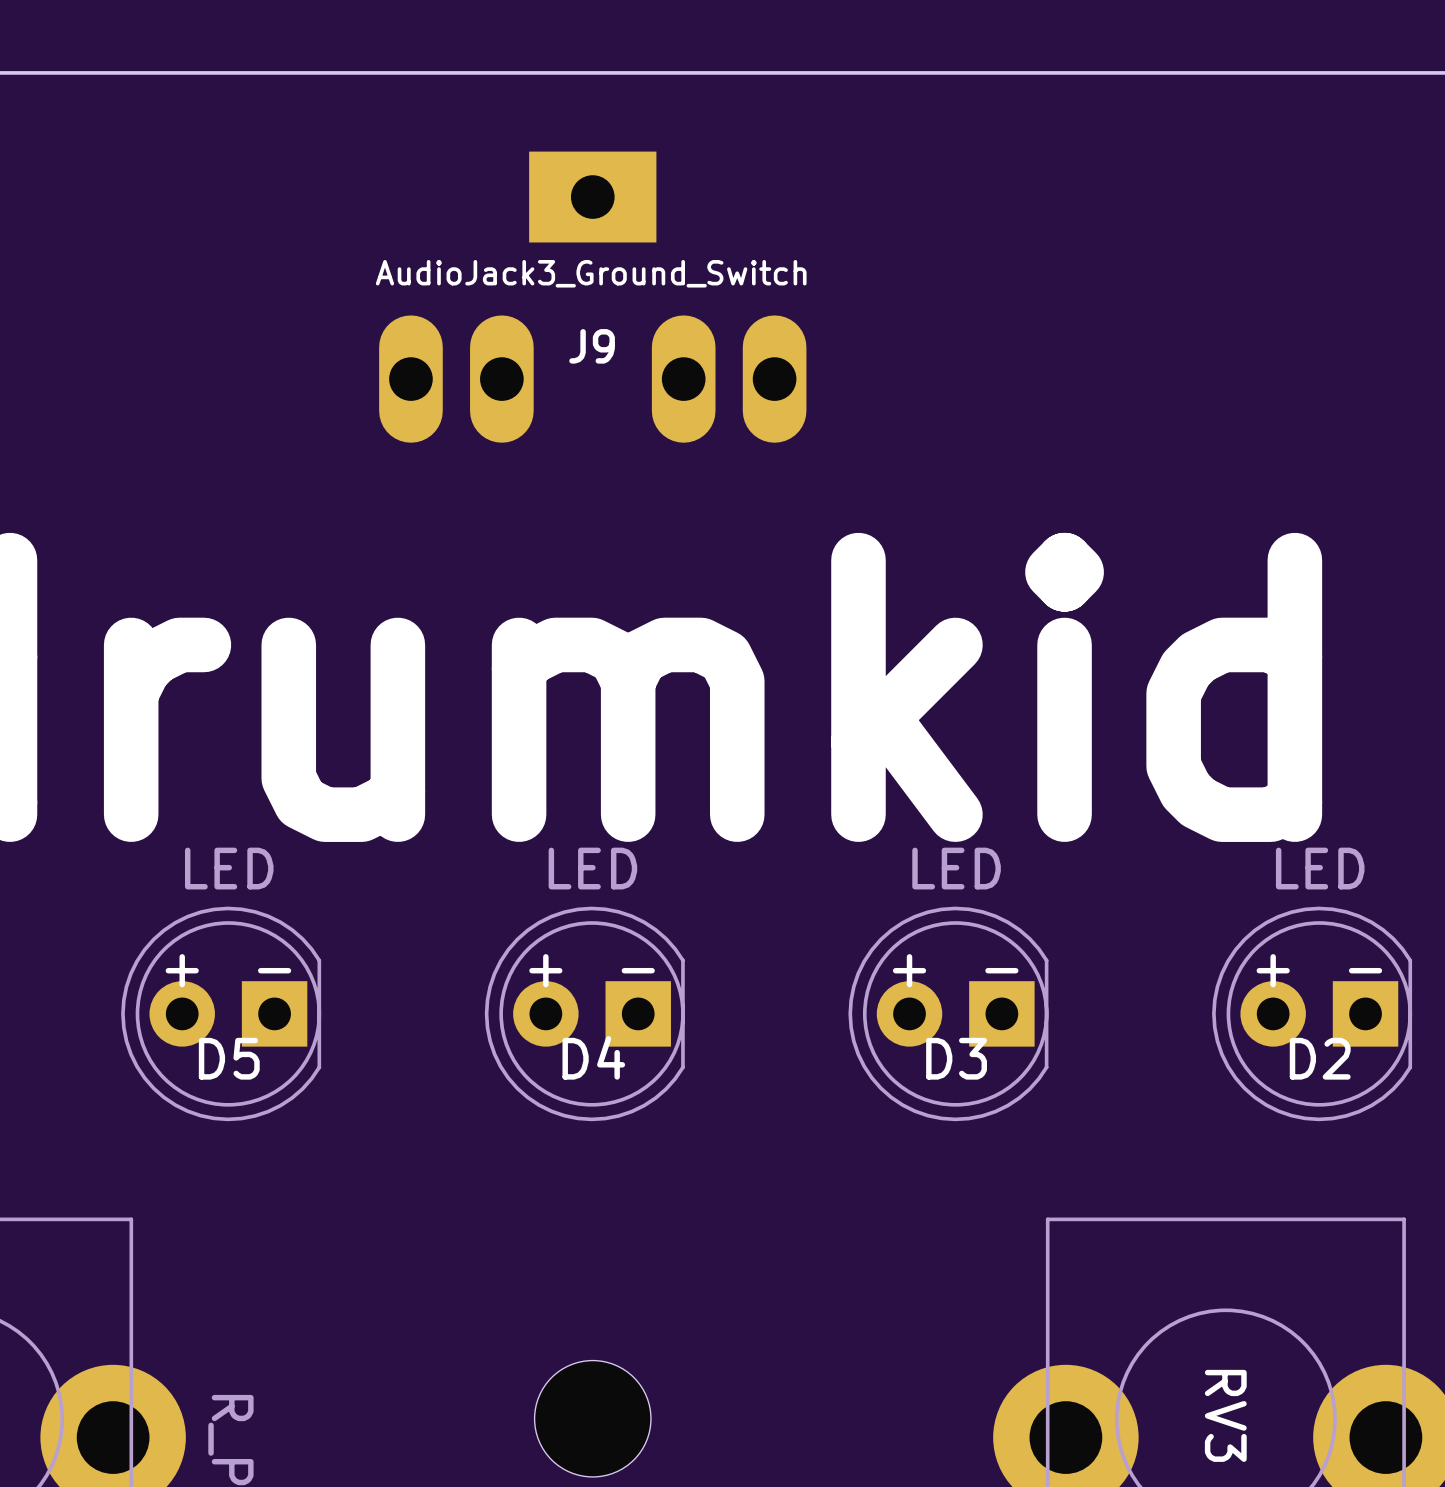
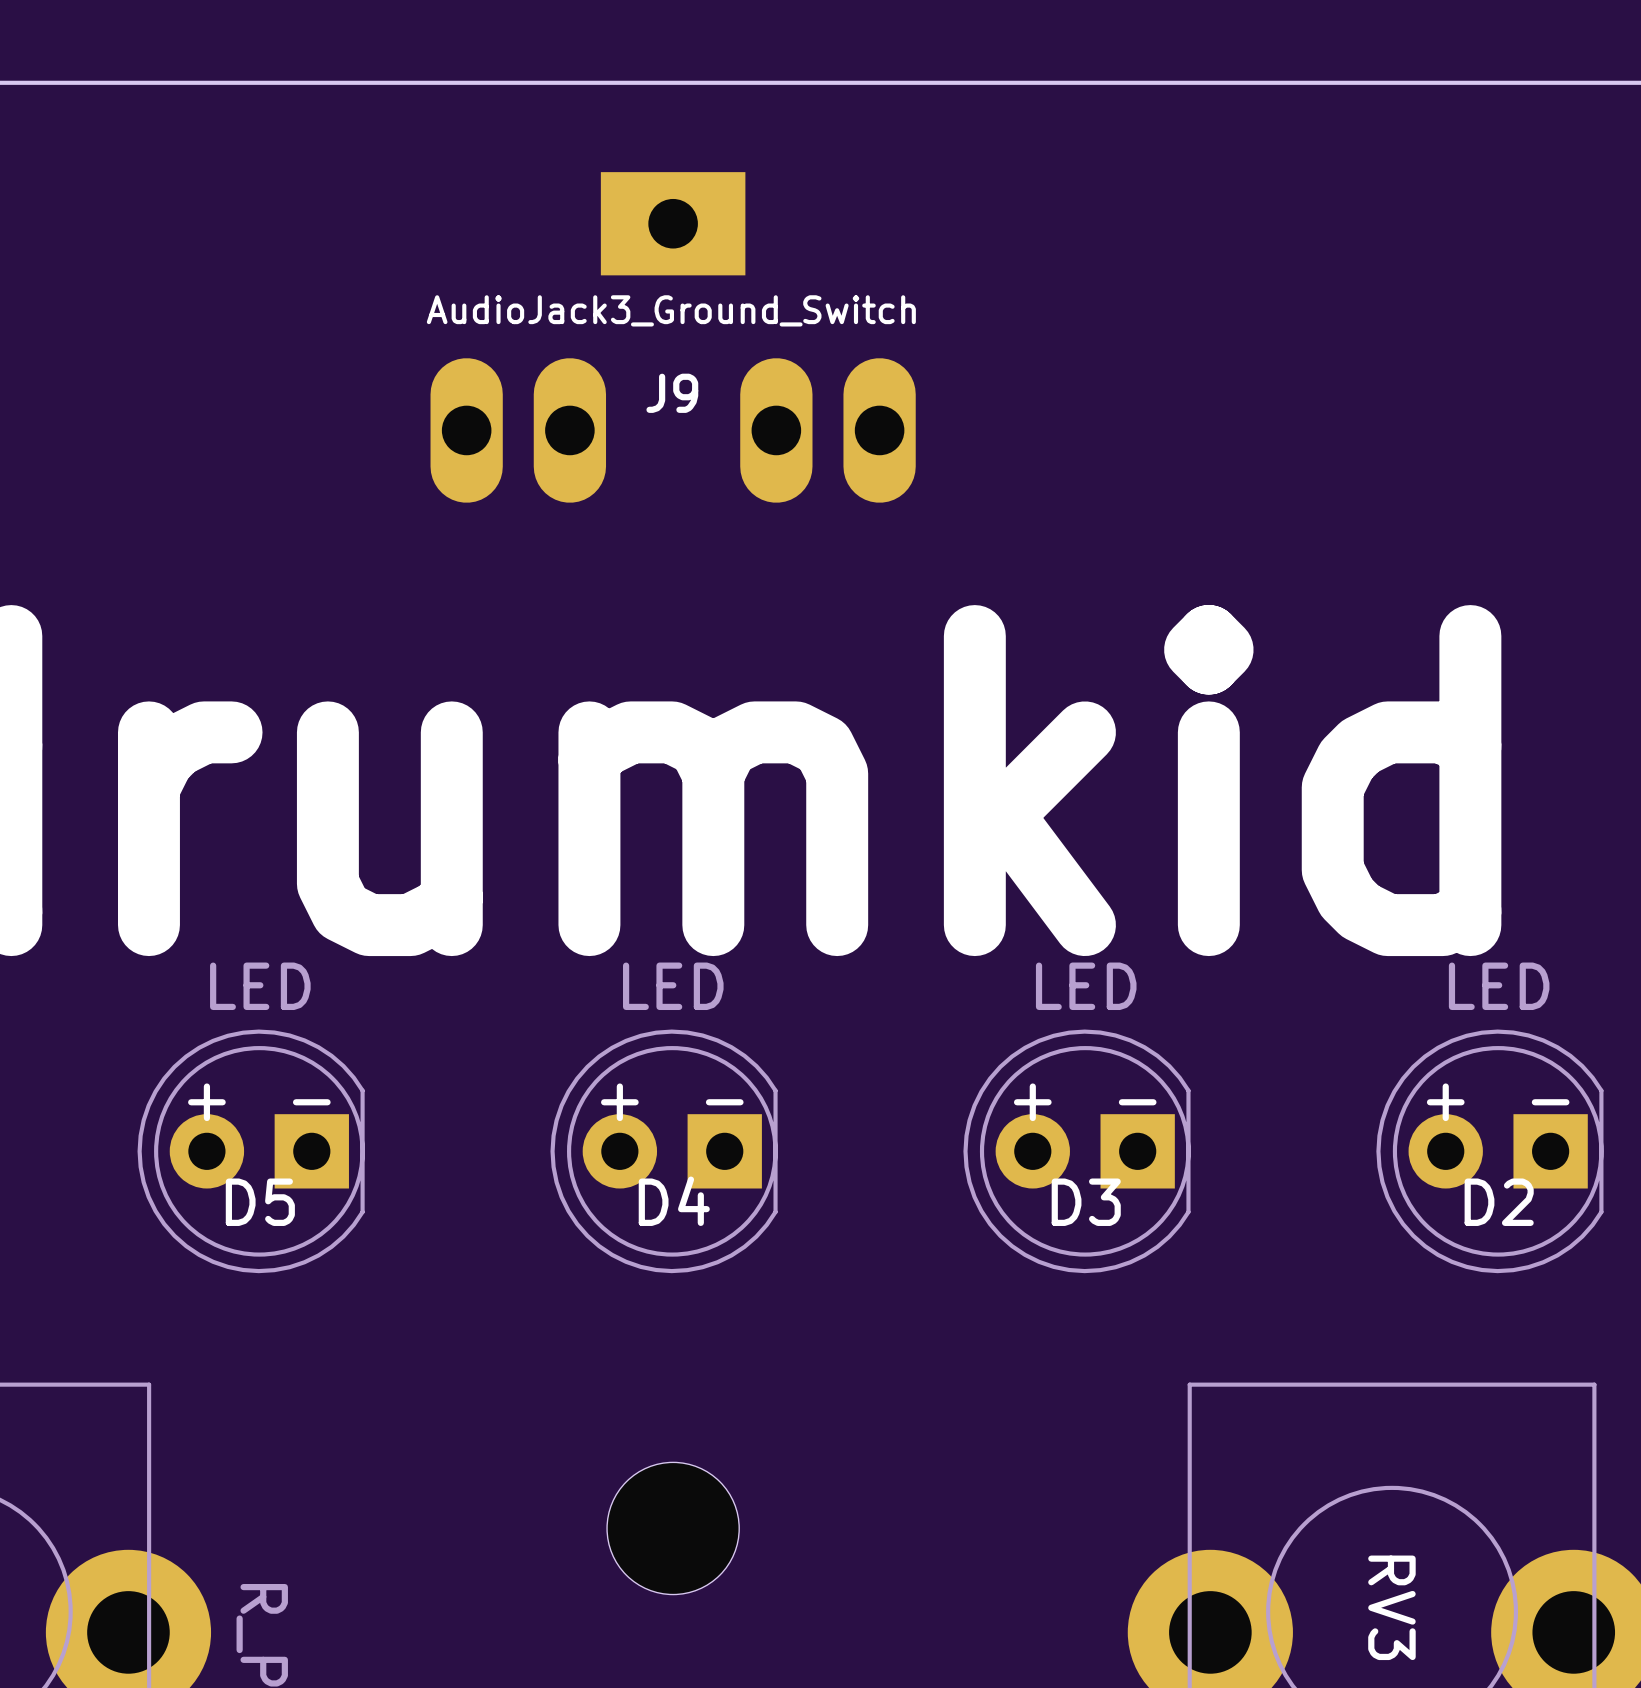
part position: (592, 1418) -> (673, 1528)

